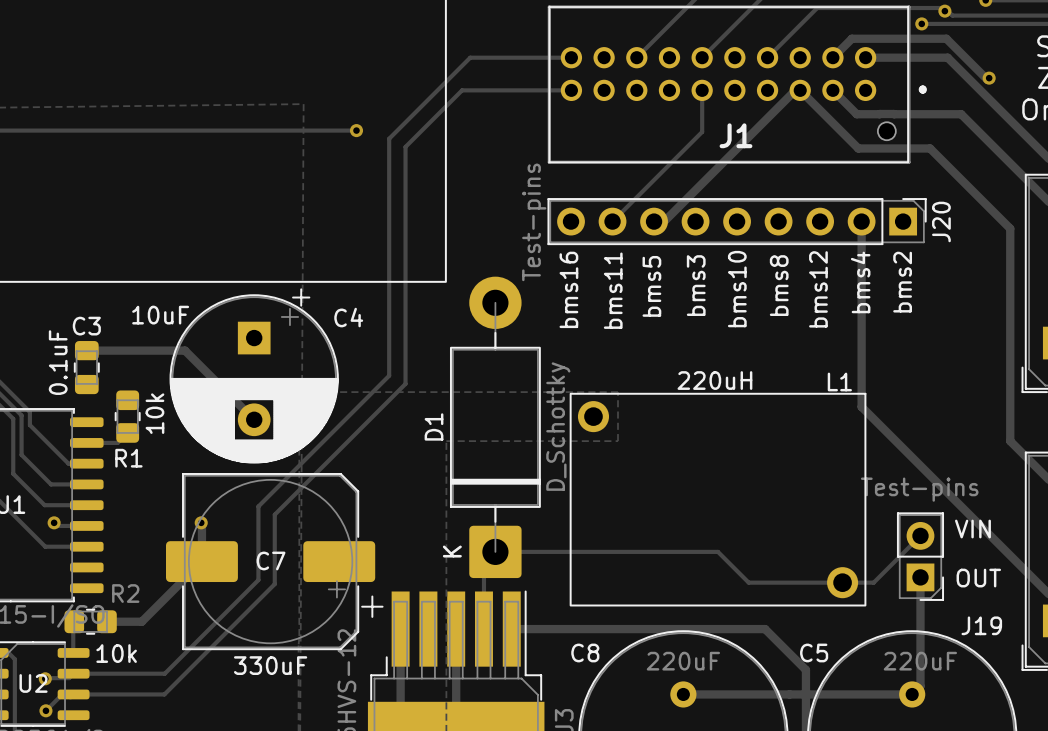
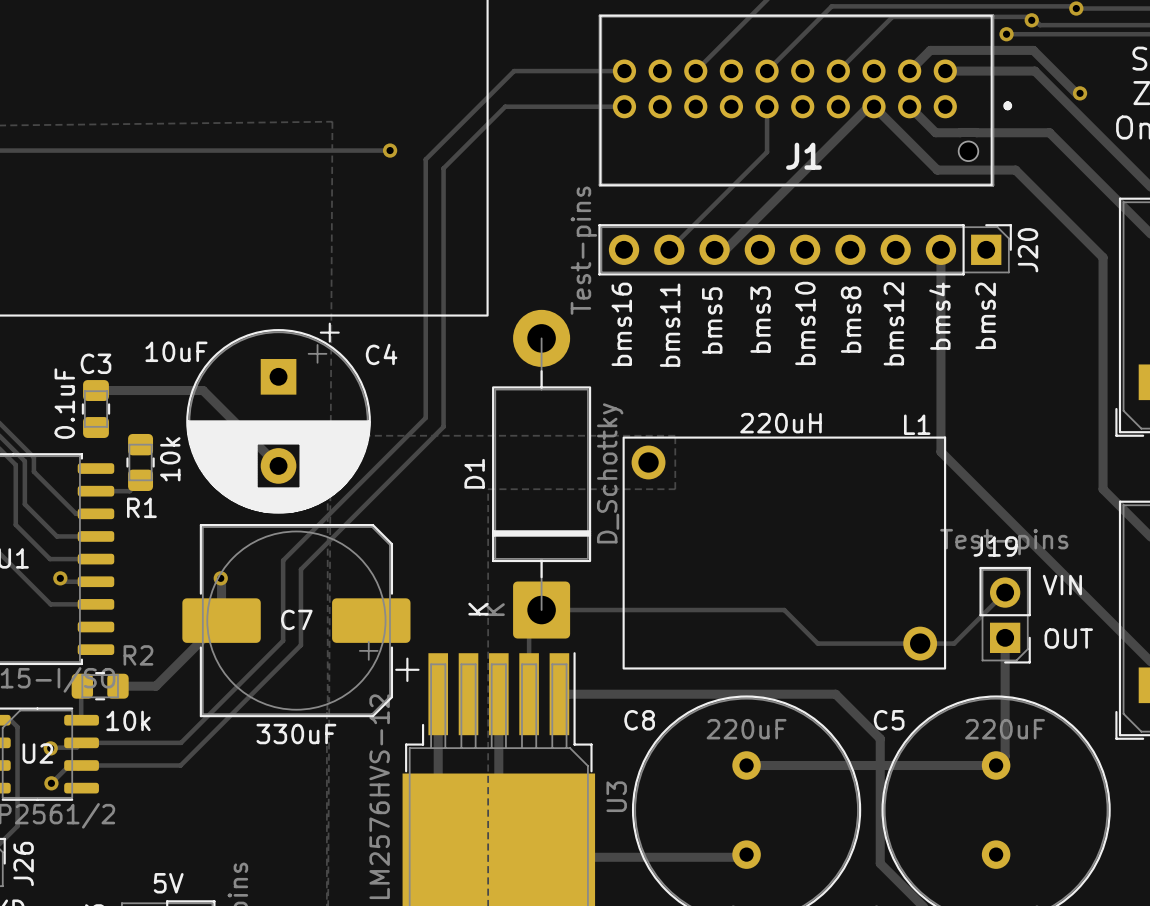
D1 footprint: [449, 276, 541, 579] -> [492, 309, 592, 639]
J19 name position: J19 (981, 625) -> J19 (995, 546)

